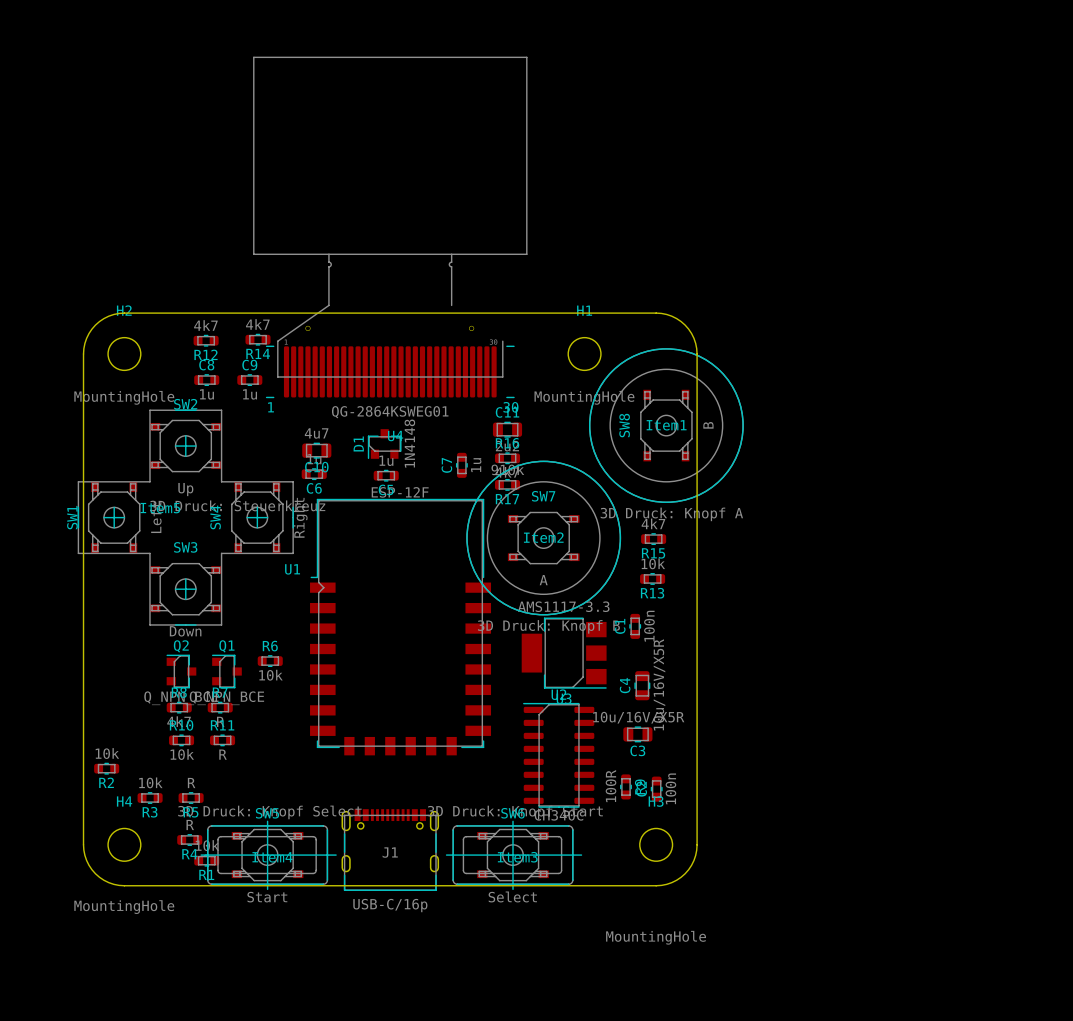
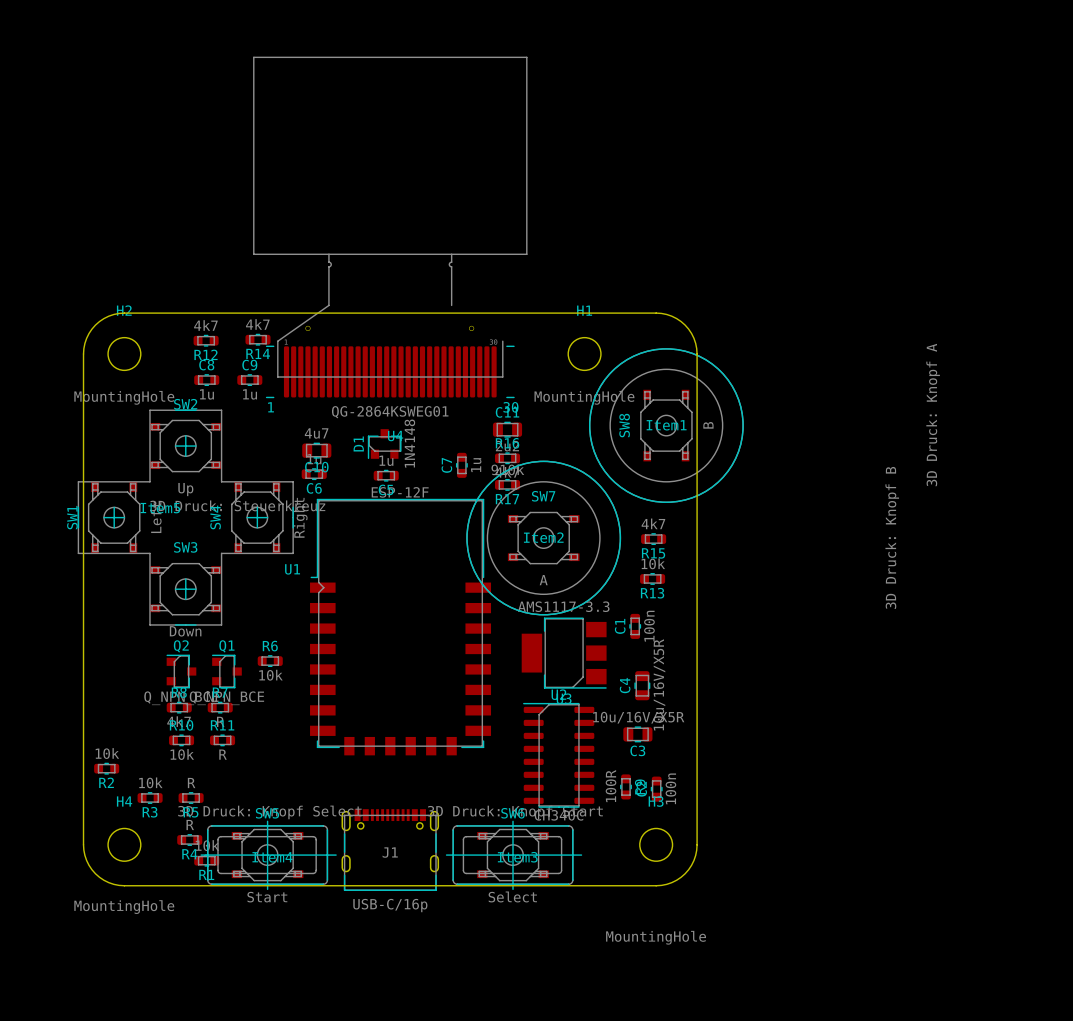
Item1 value rotation: 0° (671, 514) -> 90° counterclockwise (933, 415)
Item1 value position: 3D Druck: Knopf A (671, 514) -> 3D Druck: Knopf A (933, 415)
Item2 value rotation: 0° (548, 626) -> 90° counterclockwise (892, 537)
Item2 value position: 3D Druck: Knopf B (548, 626) -> 3D Druck: Knopf B (892, 537)

